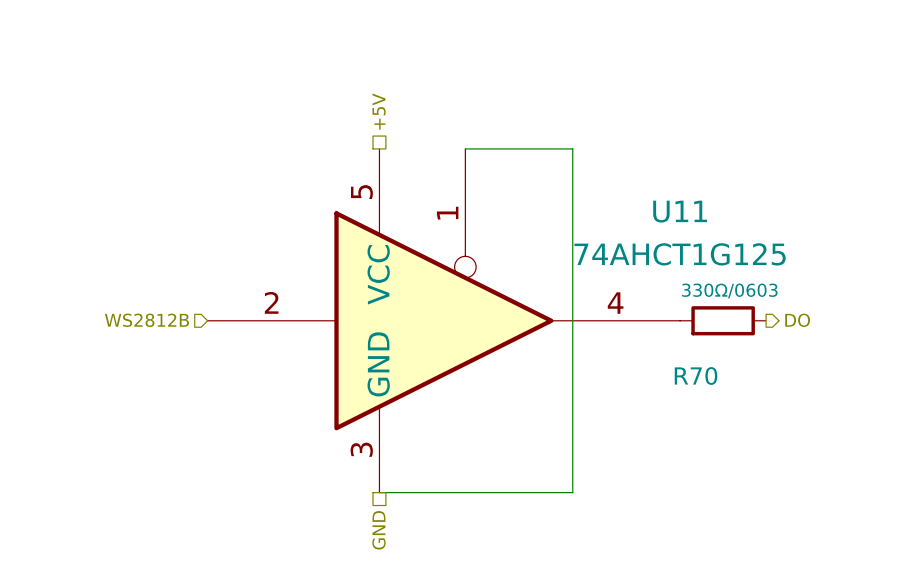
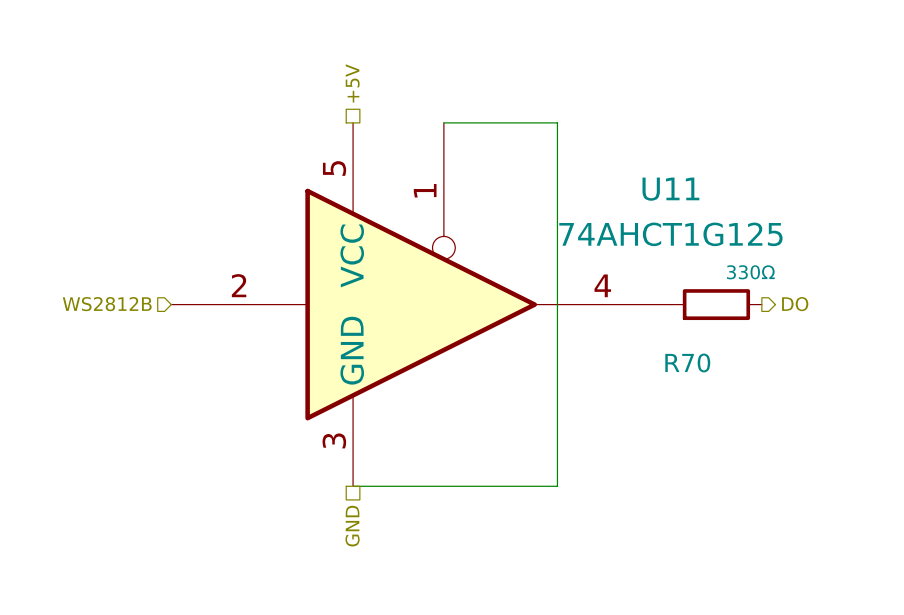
R70 value: 330Ω/0603 (729, 290) -> 330Ω (750, 272)

